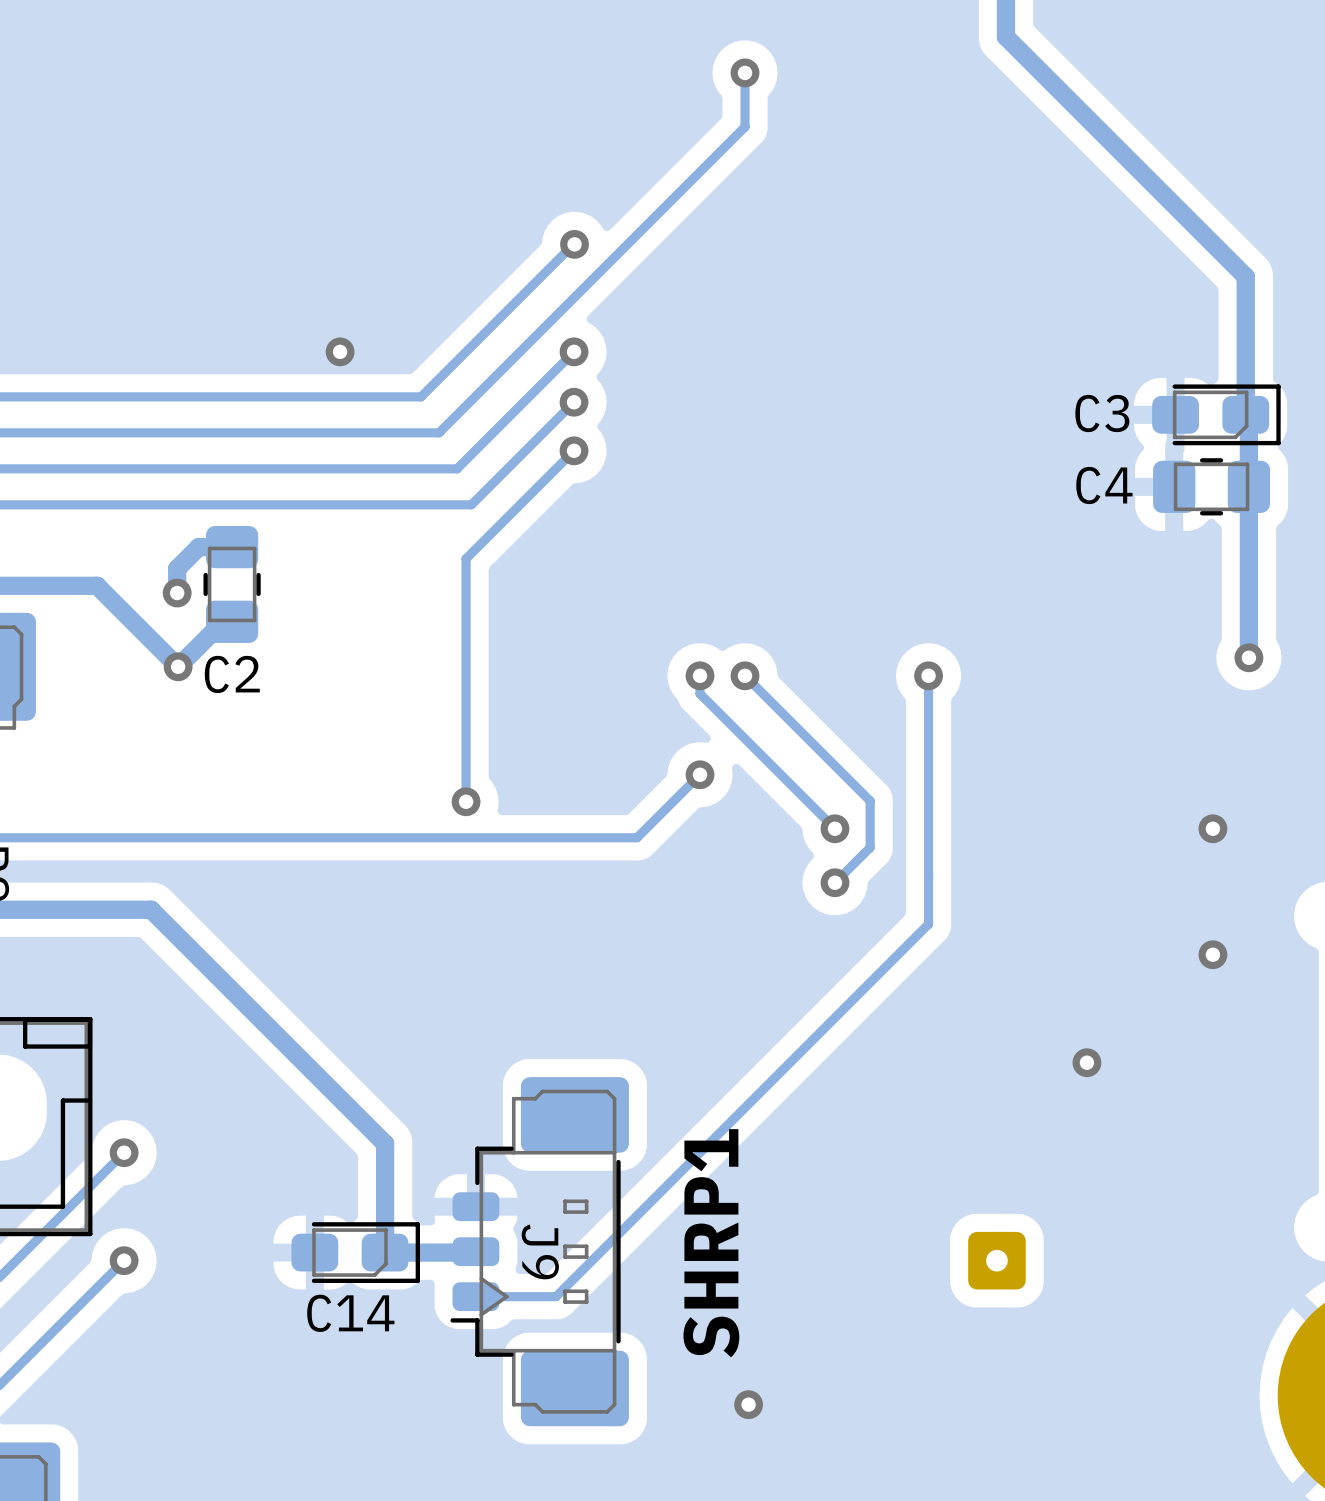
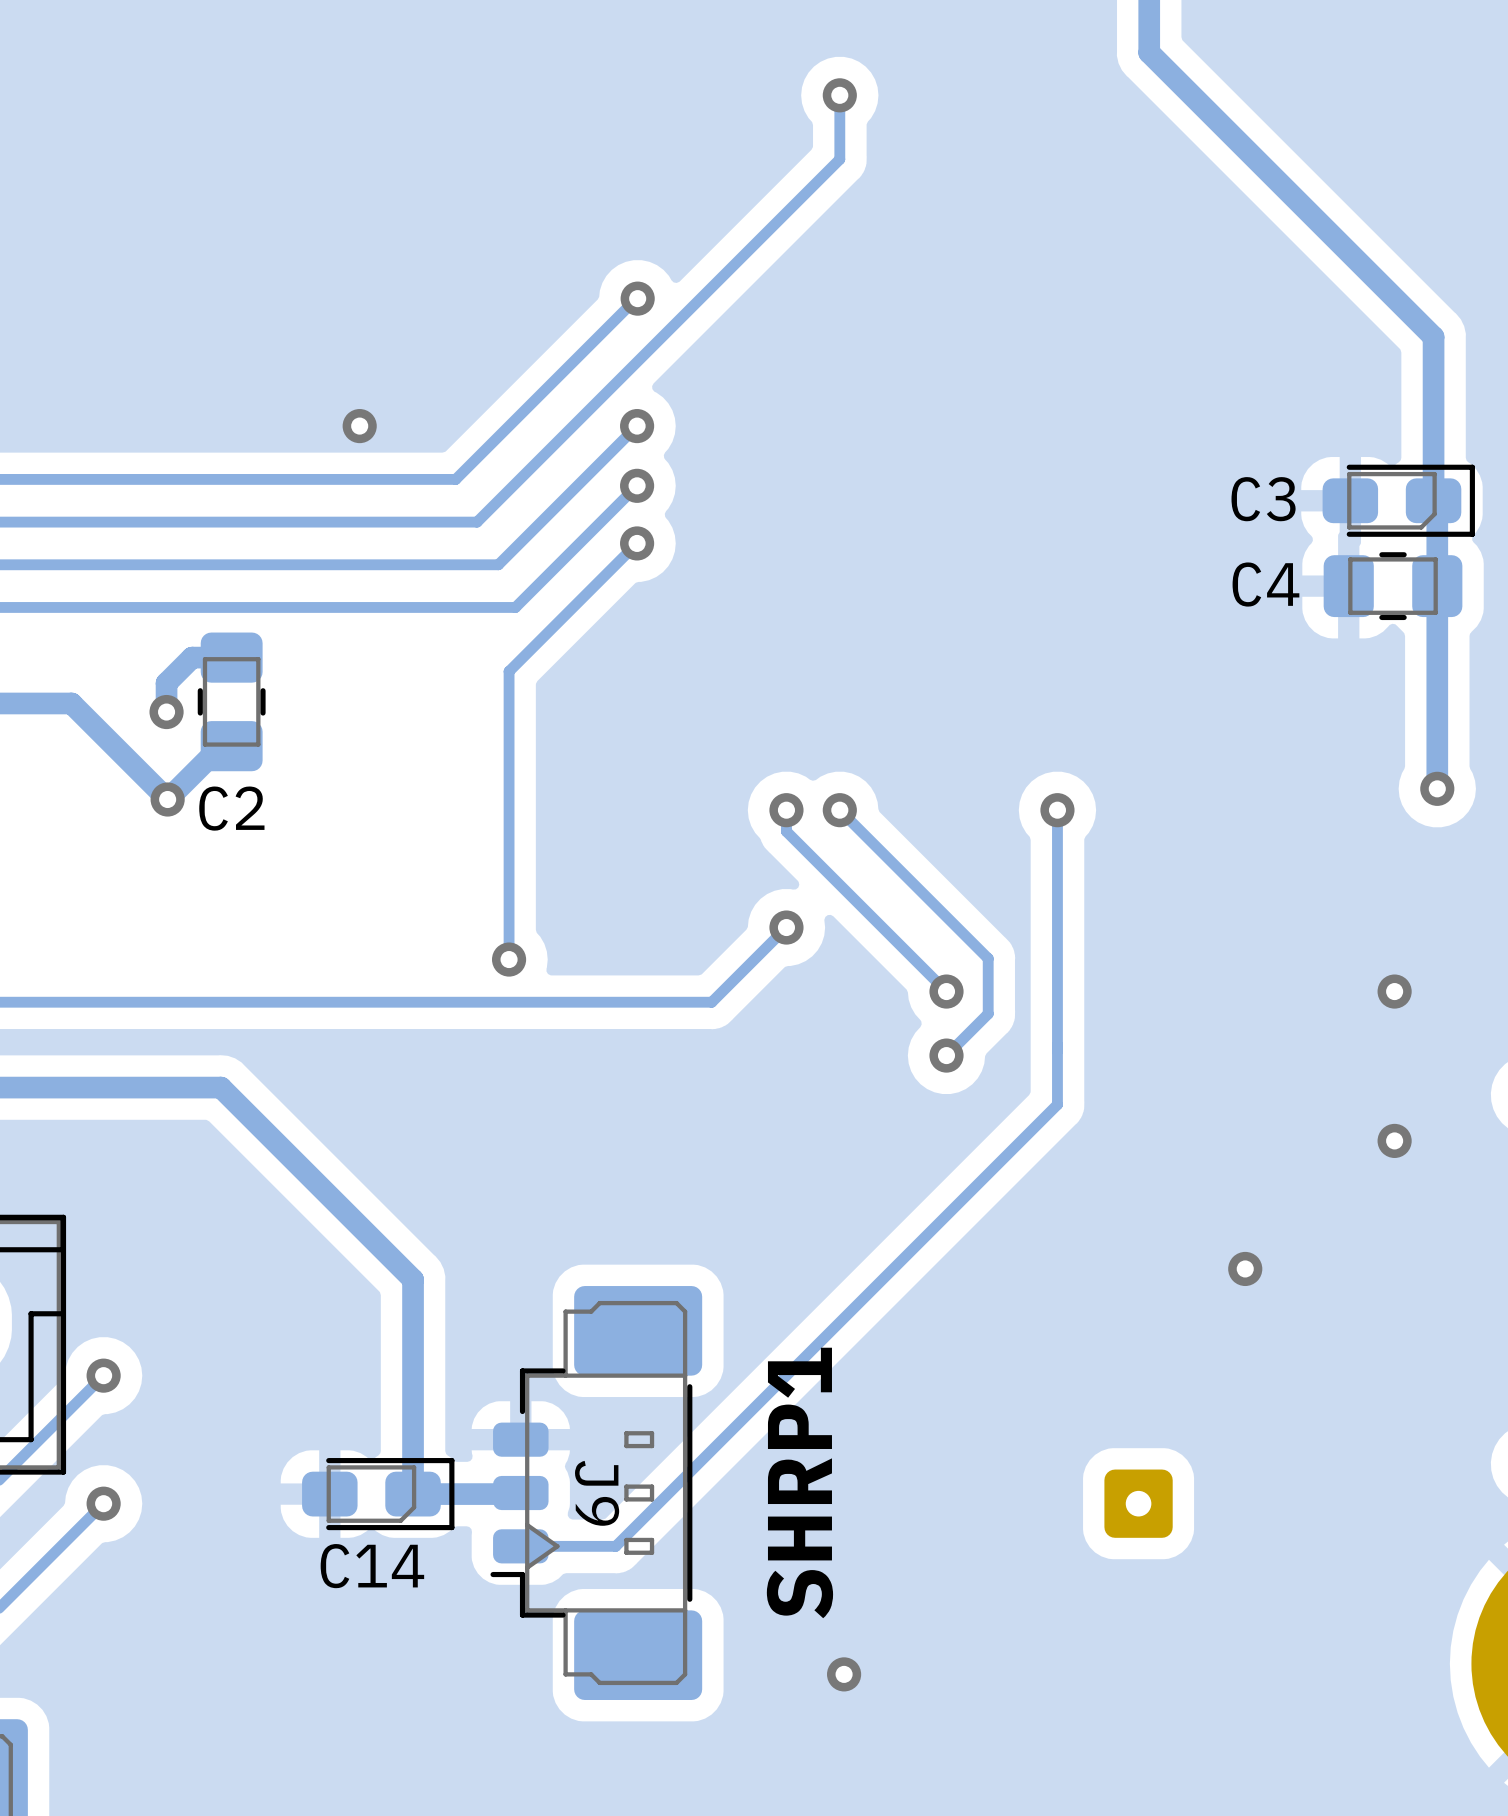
track: (151, 909) (385, 1143) -> (135, 1087) (220, 1087) (413, 1279) (413, 1364)

